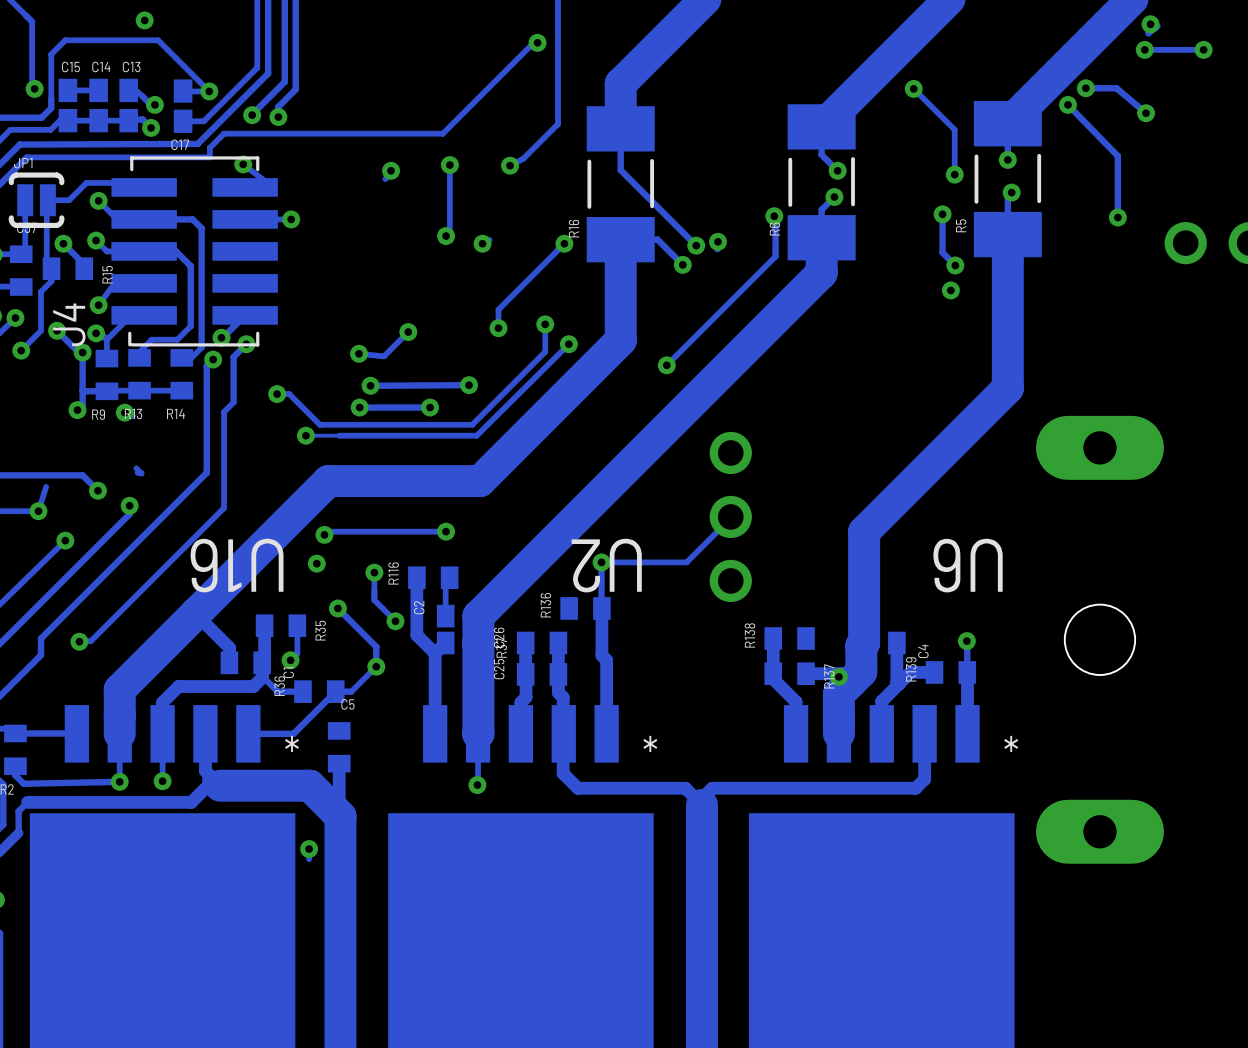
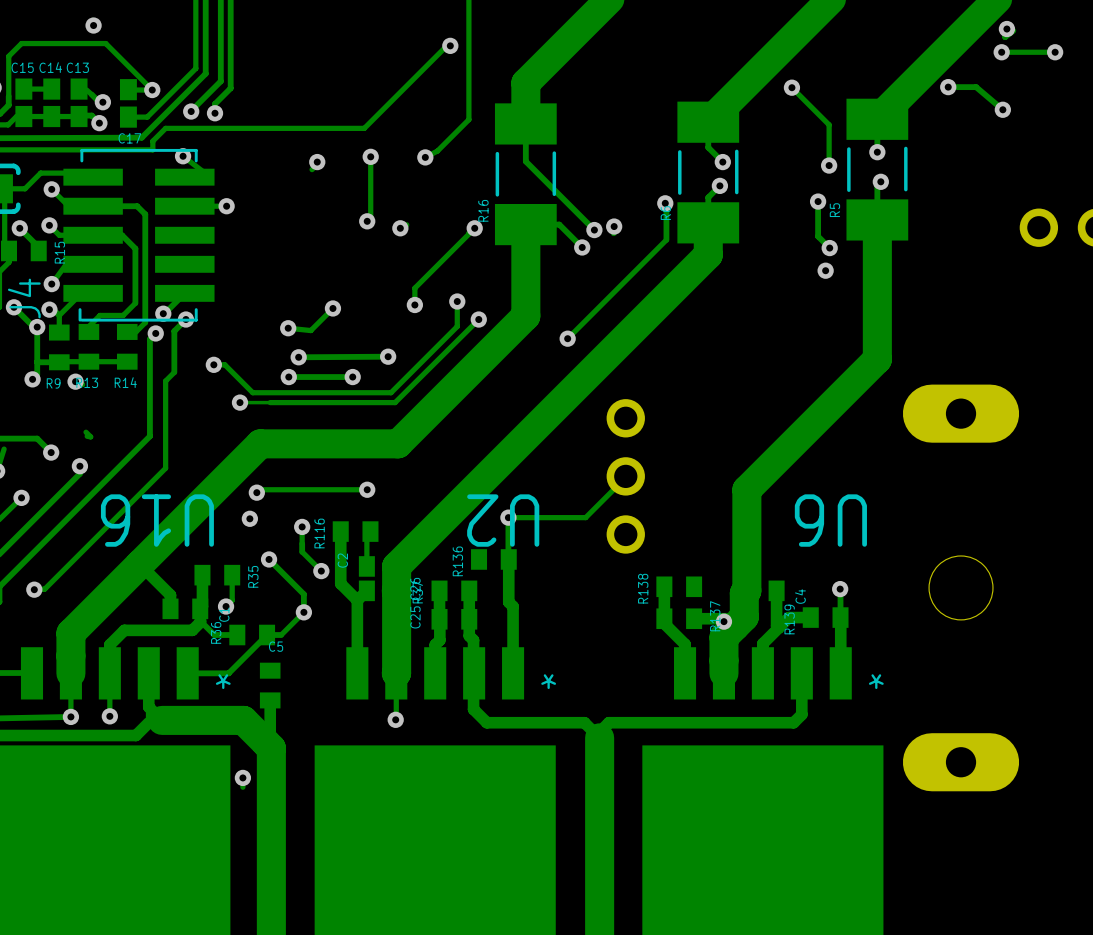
track: (1067, 104) (1117, 156) (1117, 217) -> none
via: (1067, 104) -> none
via: (1117, 217) -> none

